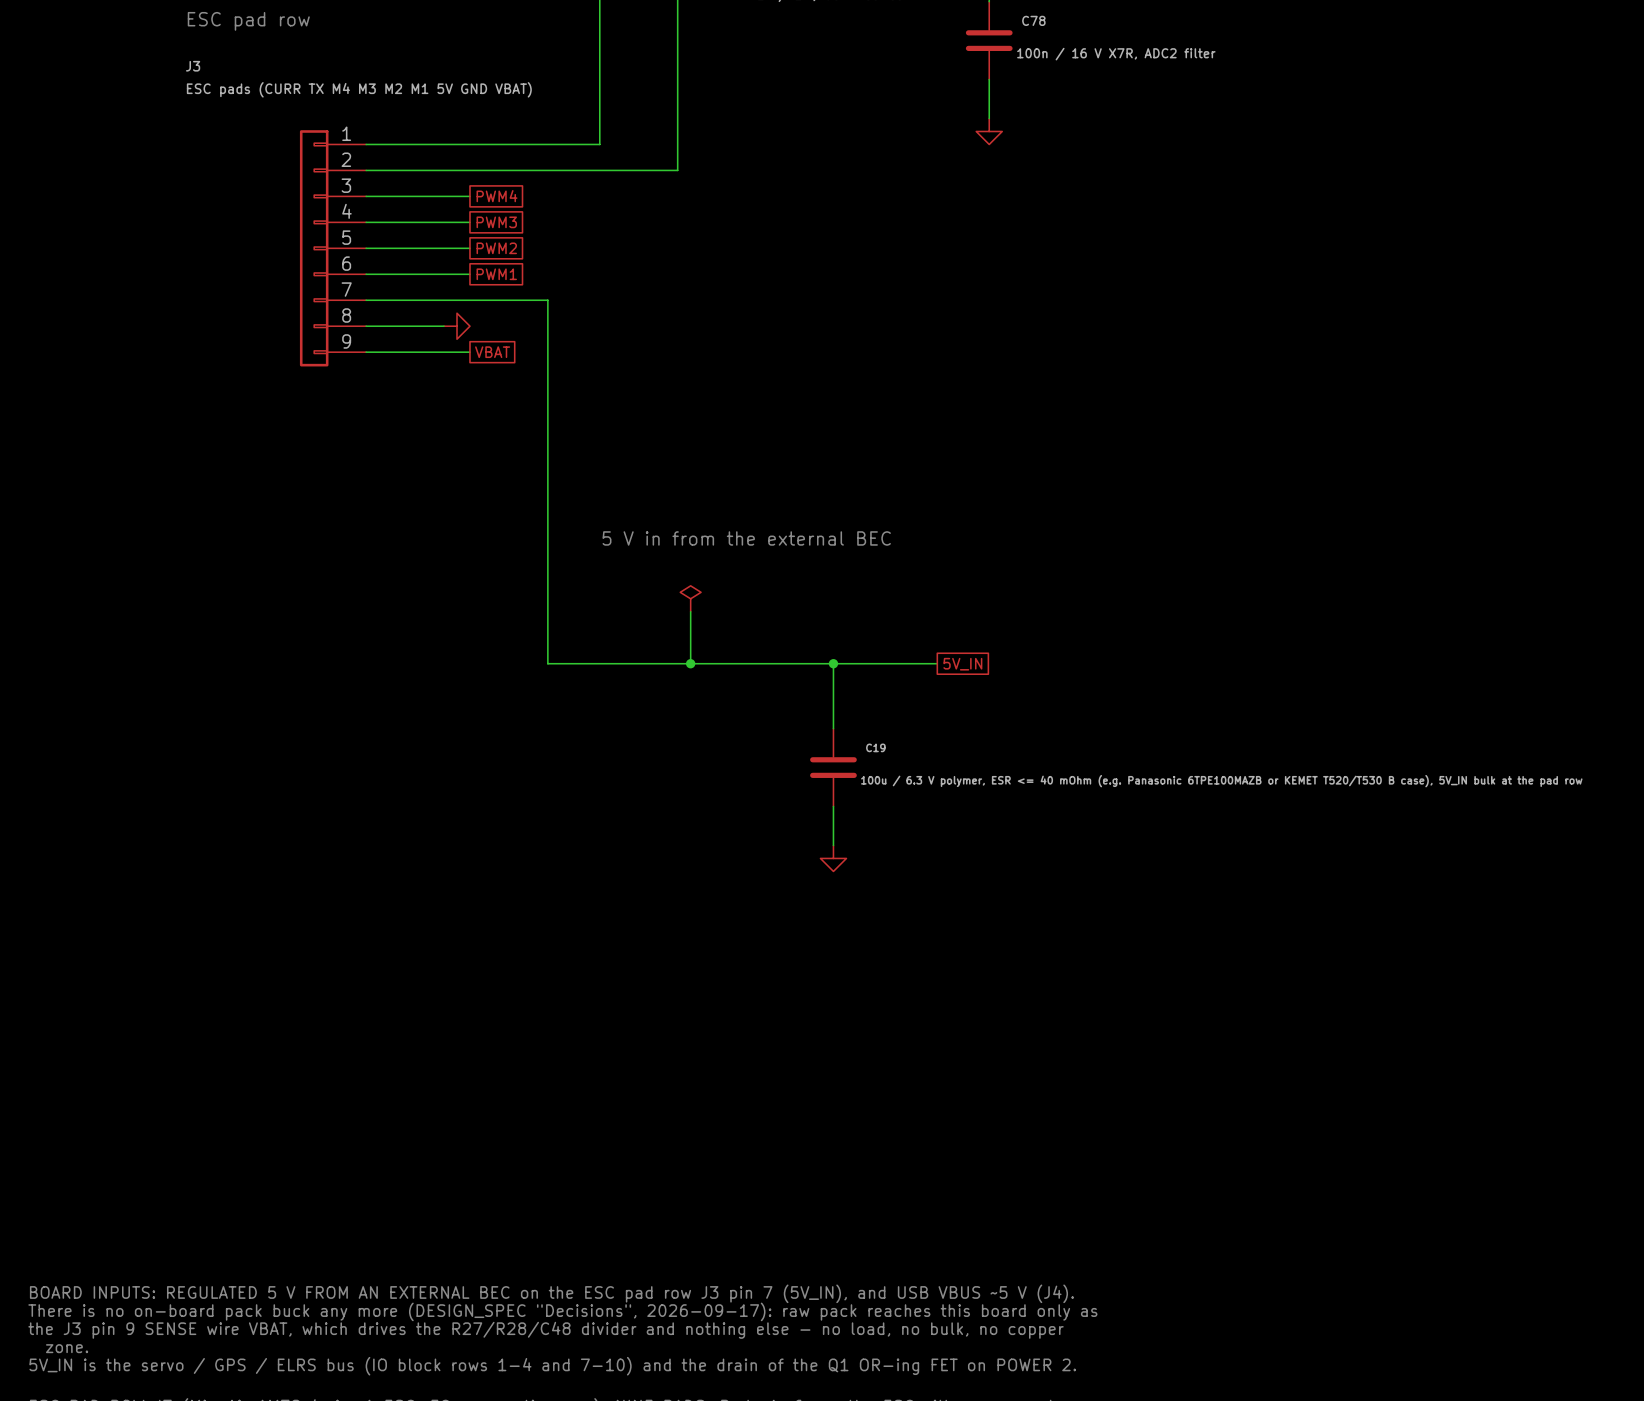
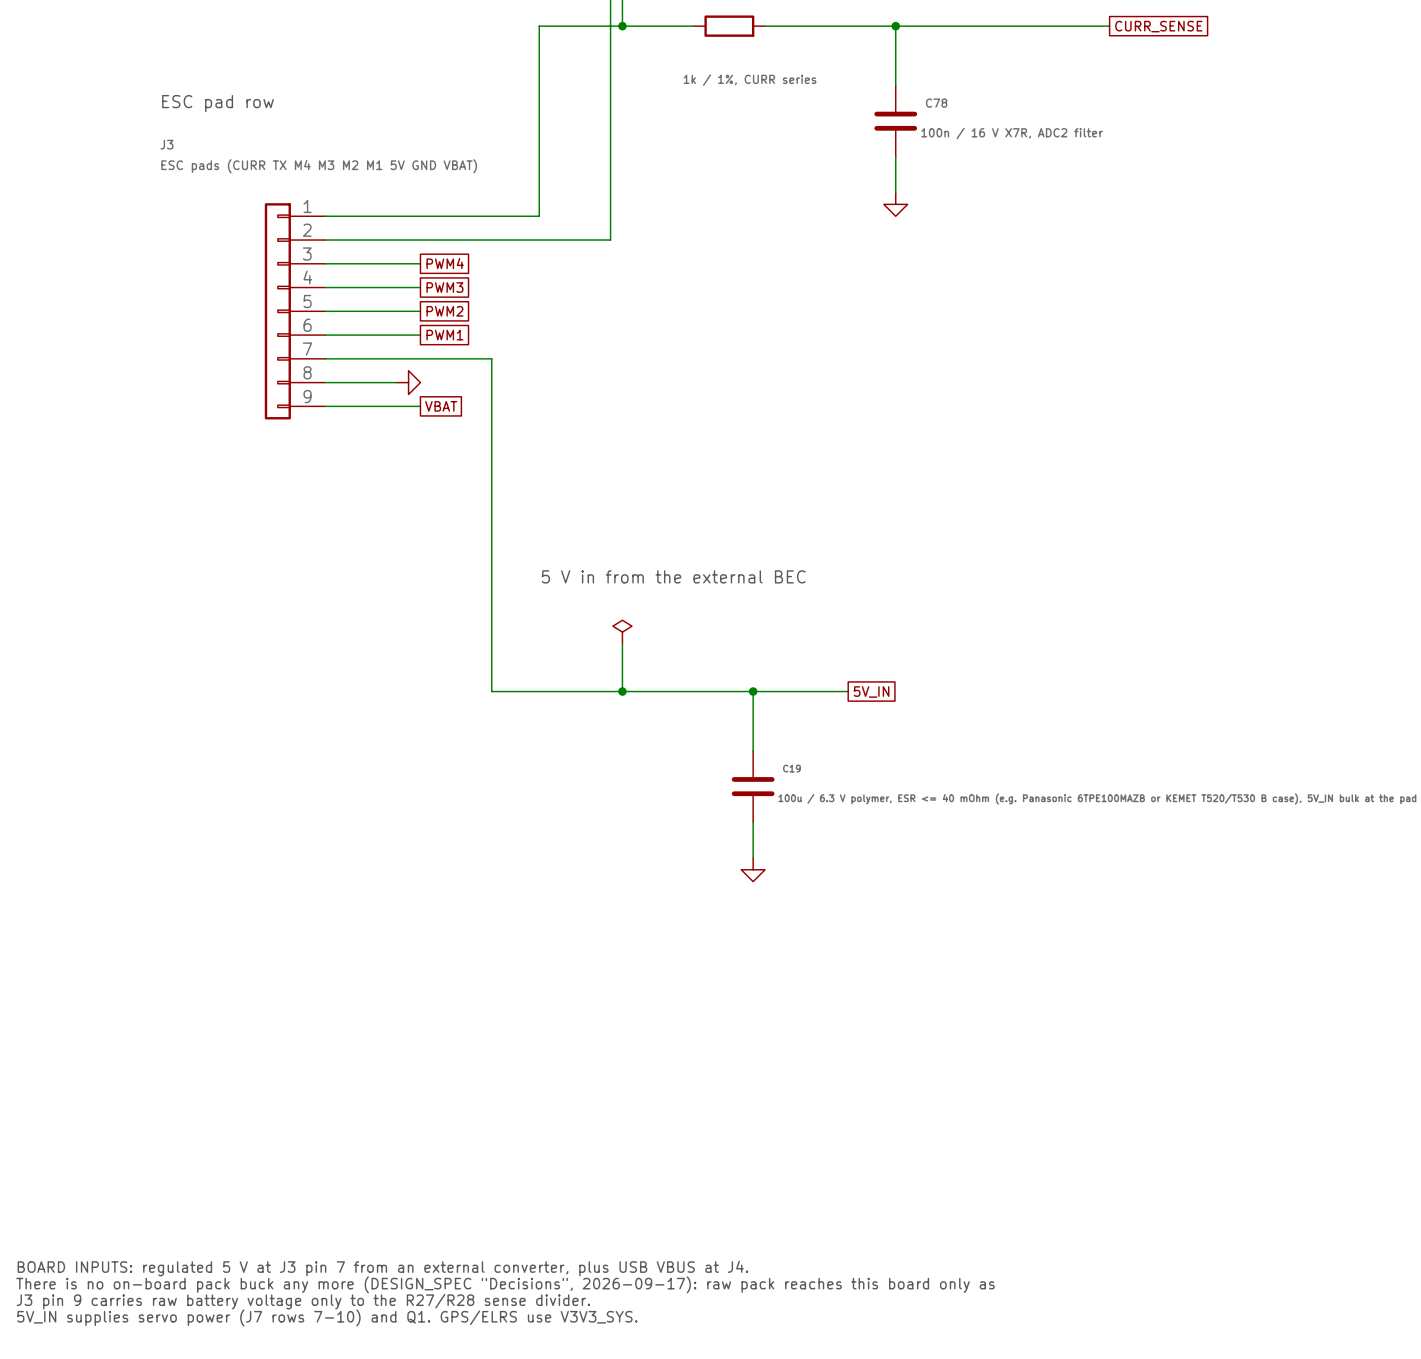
text: BOARD INPUTS: REGULATED 5 V FROM AN EXTERNAL BEC on the ESC pad row J3 pin 7 (5V_IN), and USB VBUS ~5 V (J4). (551, 1293) -> BOARD INPUTS: regulated 5 V at J3 pin 7 from an external converter, plus USB VBUS at J4. (382, 1268)
text: the J3 pin 9 SENSE wire VBAT, which drives the R27/R28/C48 divider and nothing else - no load, no bulk, no copper (546, 1330) -> J3 pin 9 carries raw battery voltage only to the R27/R28 sense divider. (303, 1301)
text: zone. (67, 1348) -> 5V_IN supplies servo power (J7 rows 7-10) and Q1. GPS/ELRS use V3V3_SYS. (327, 1317)
text: 5V_IN is the servo / GPS / ELRS bus (IO block rows 1-4 and 7-10) and the drain of the Q1 OR-ing FET on POWER 2. (552, 1366) -> none

